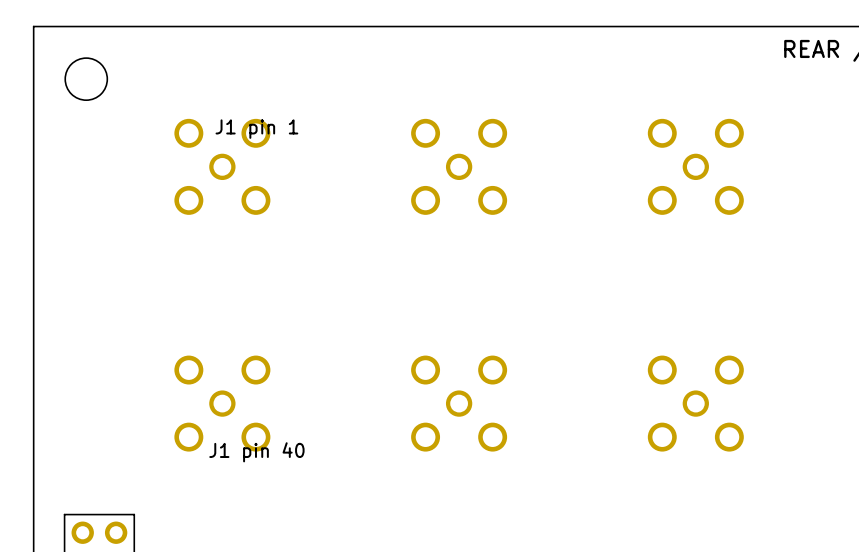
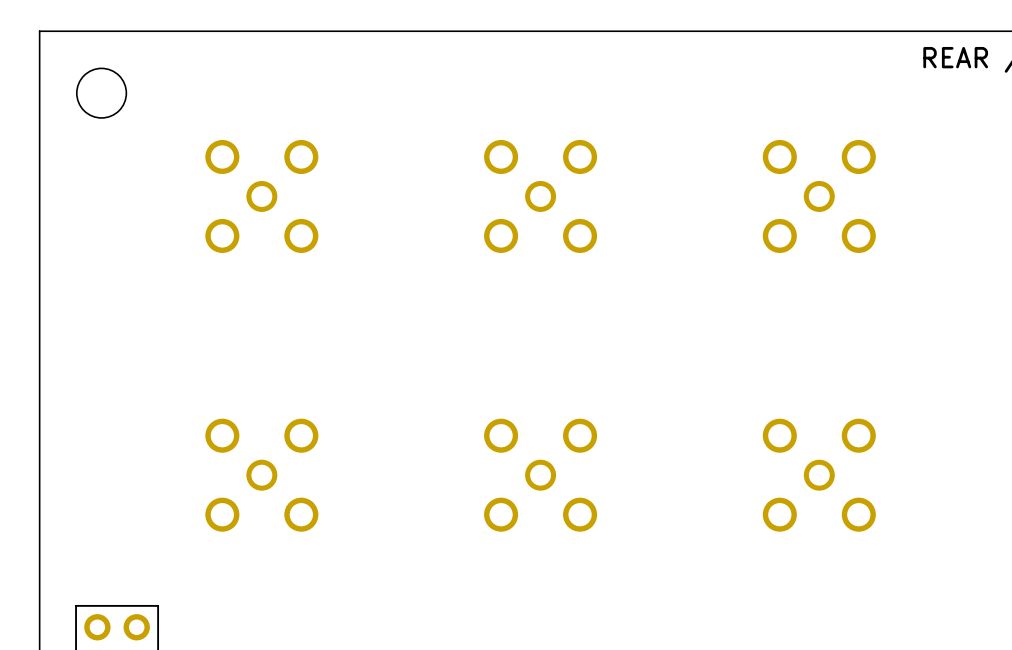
text: J1 pin 1 (256, 129) -> none
text: J1 pin 40 (256, 452) -> none

